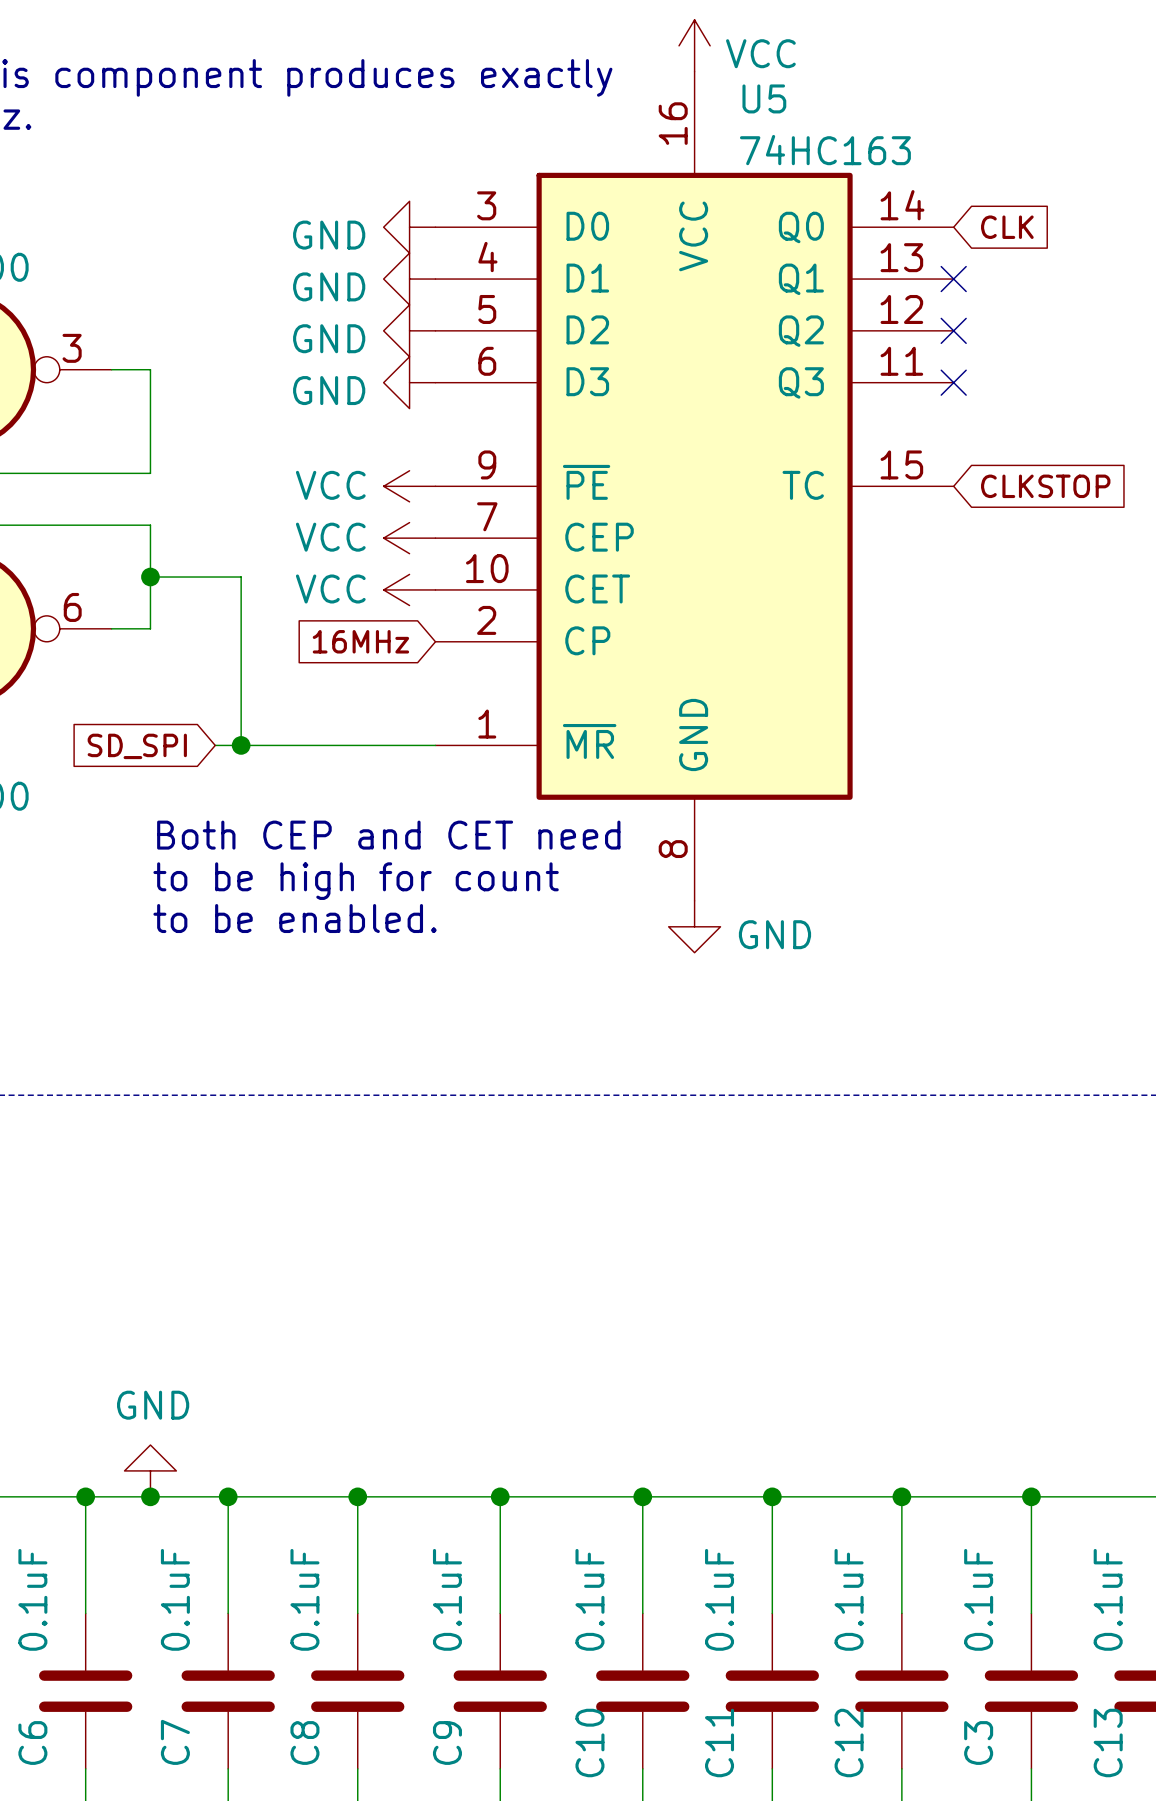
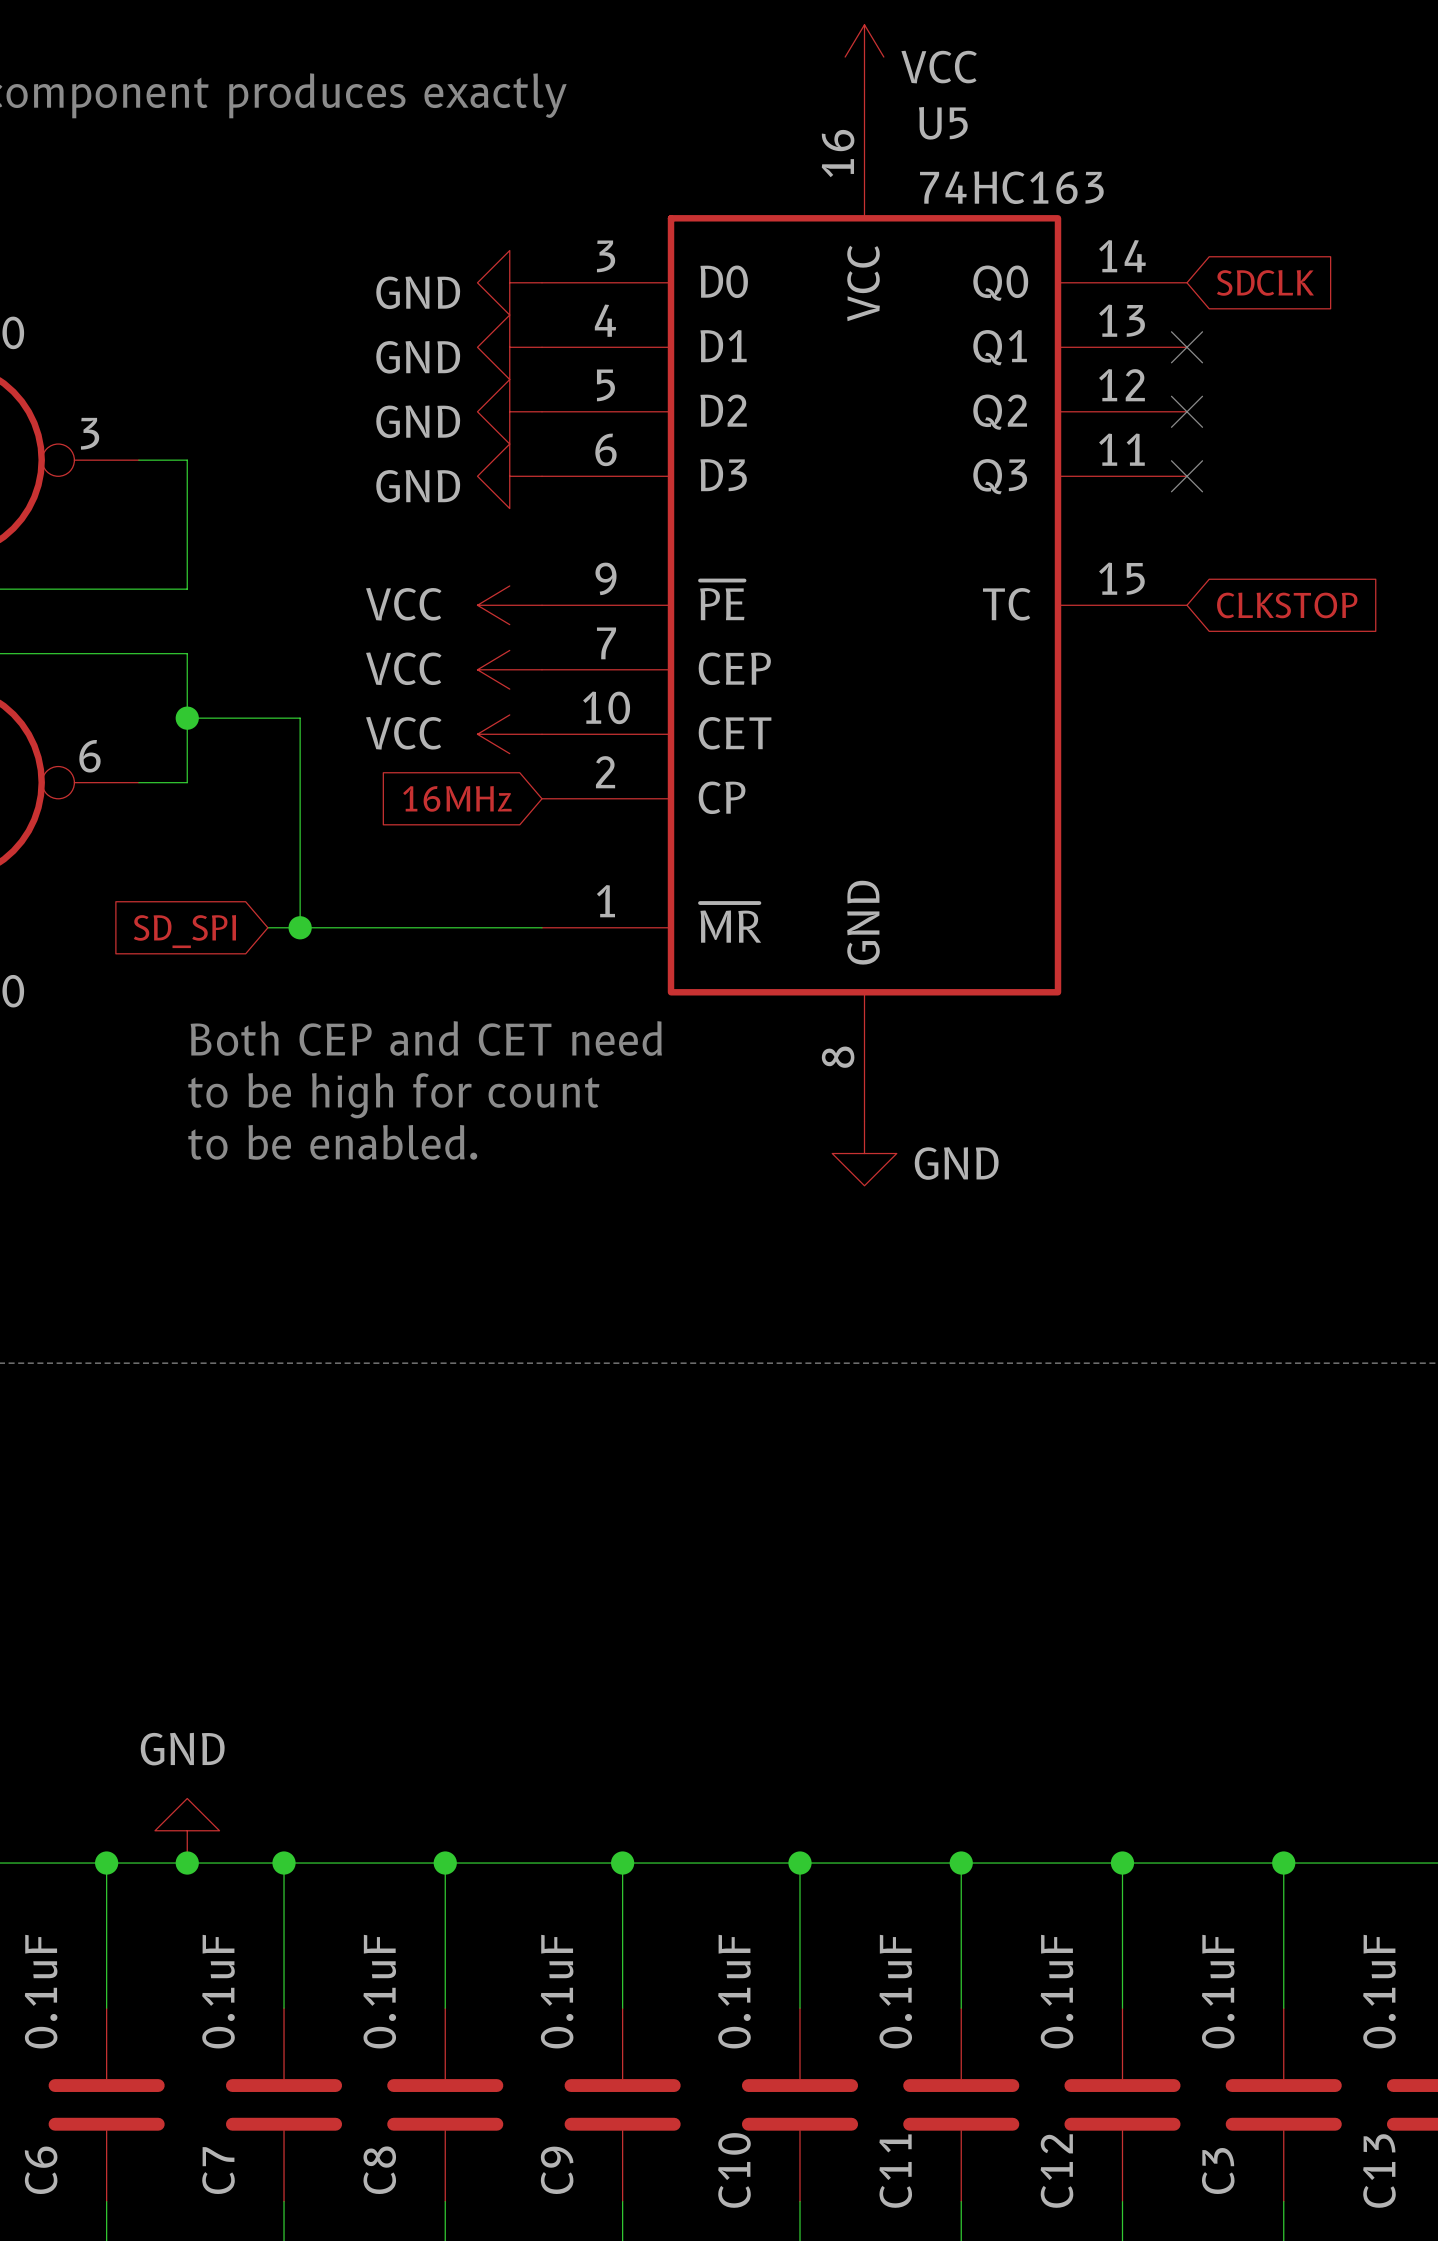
global label: CLK (1007, 227) -> SDCLK (1265, 282)

